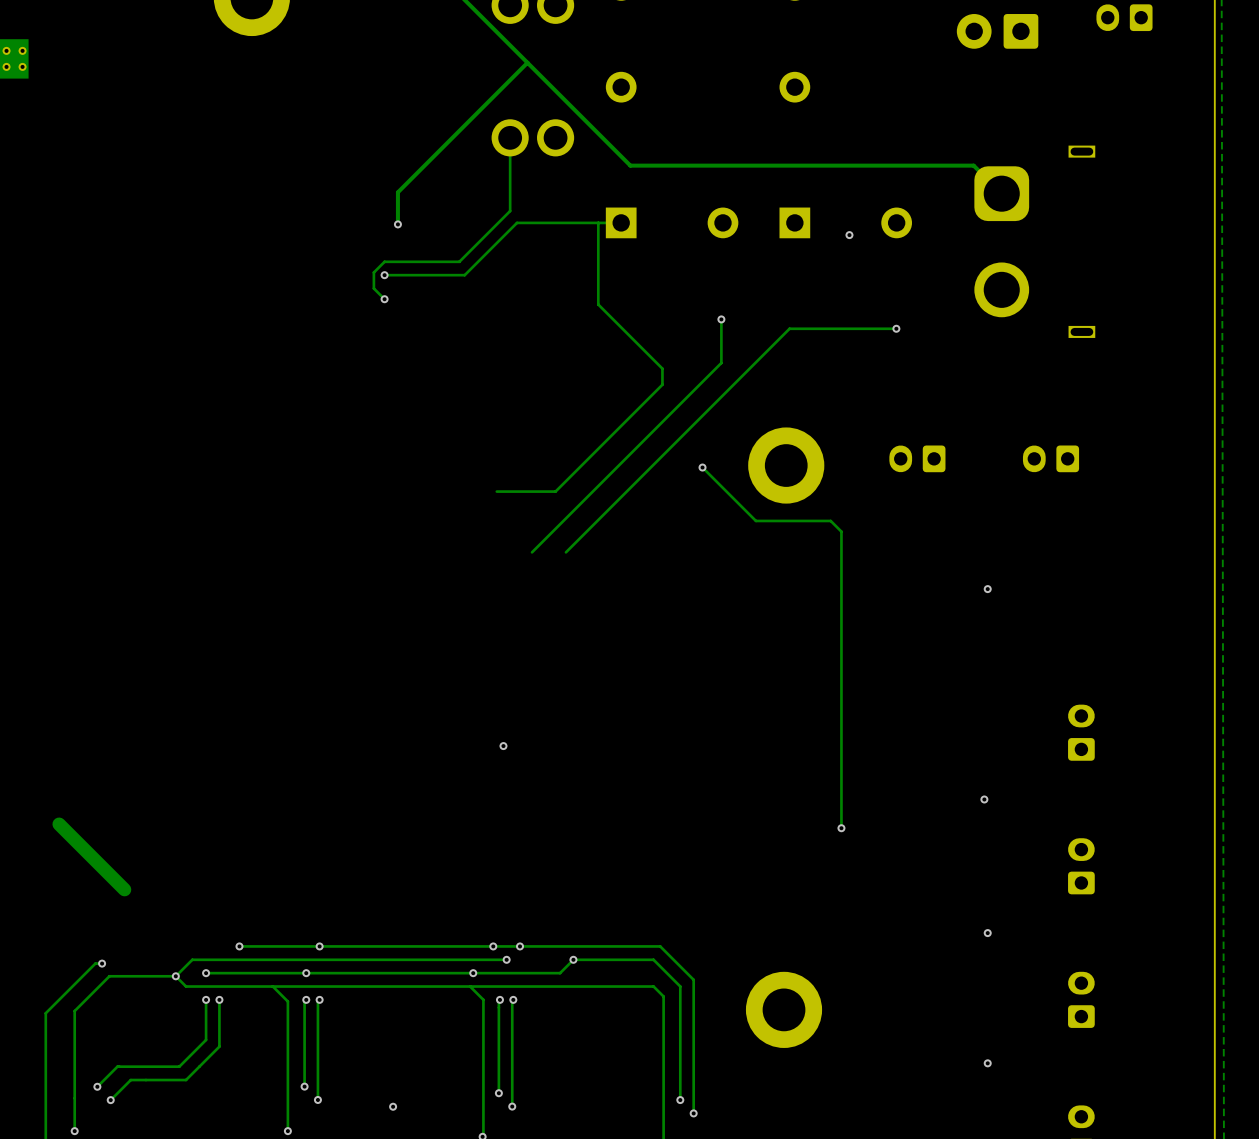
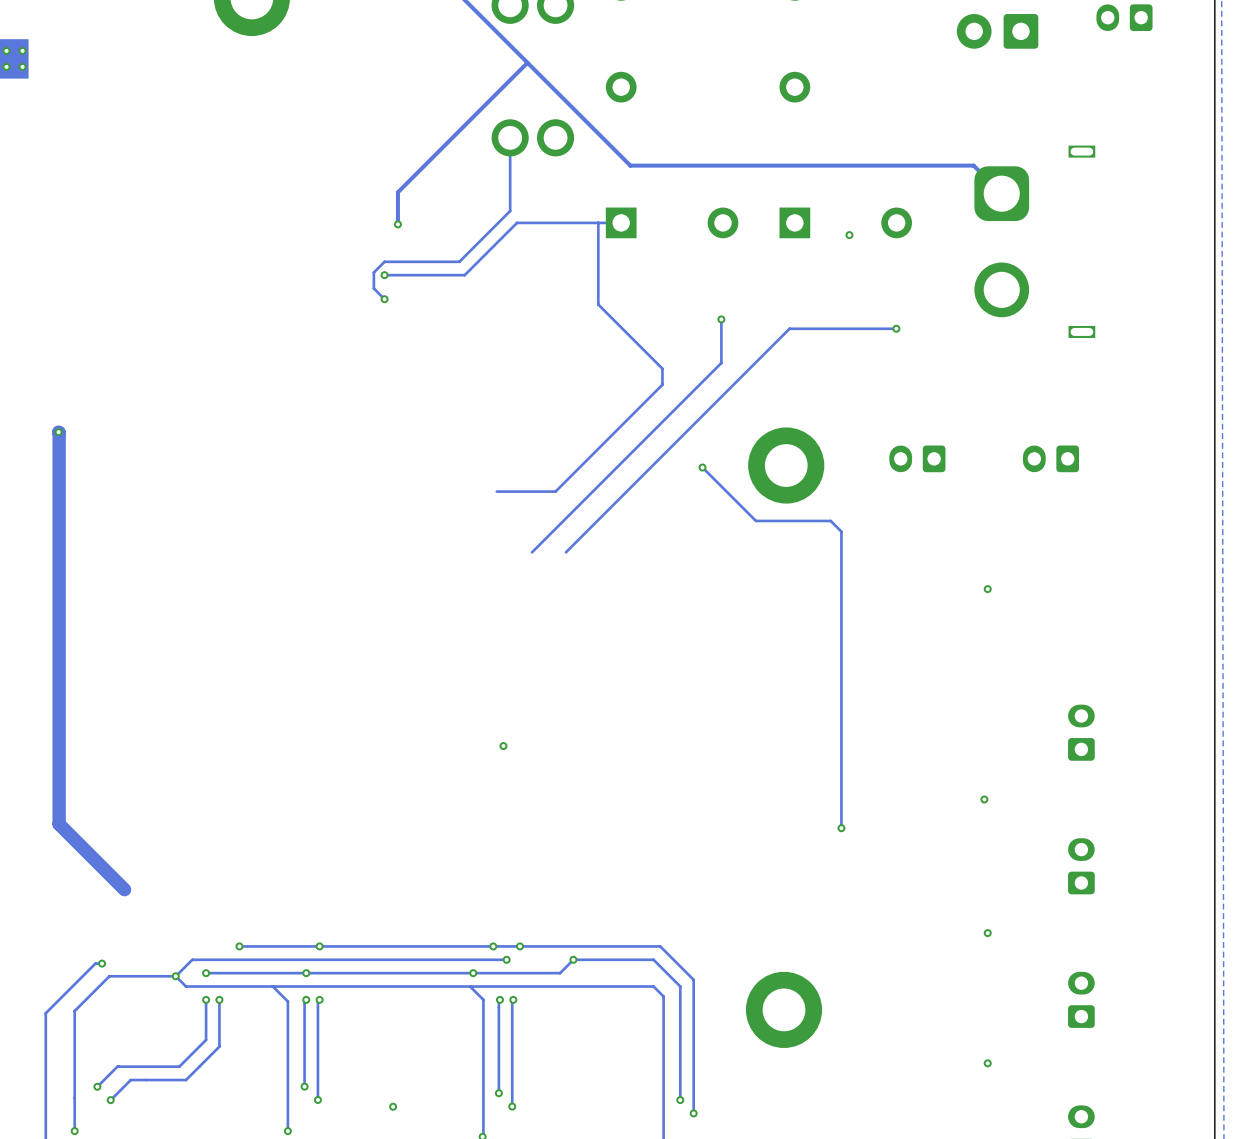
track: none -> (58, 432) (59, 824)
via: none -> (58, 432)

